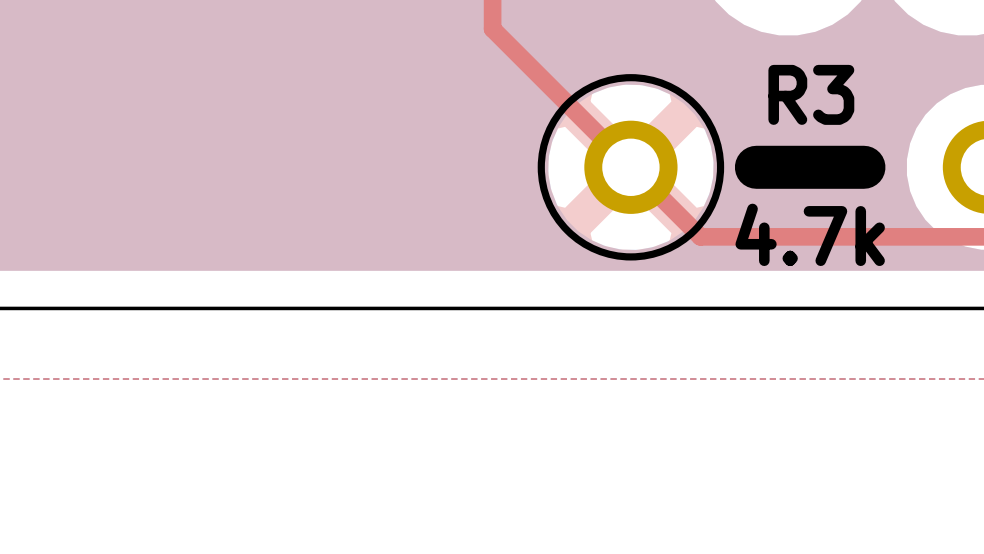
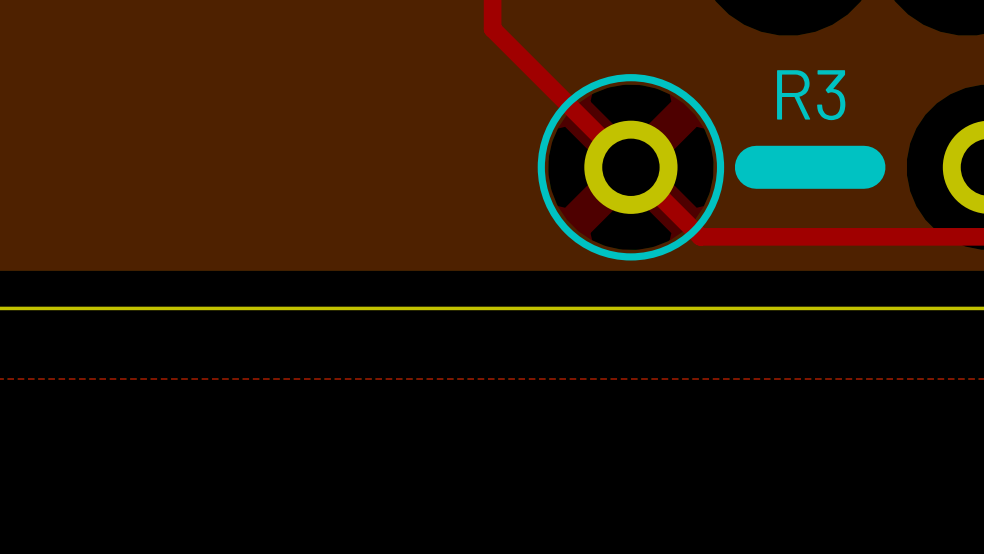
R3 value: 4.7k (810, 234) -> none

